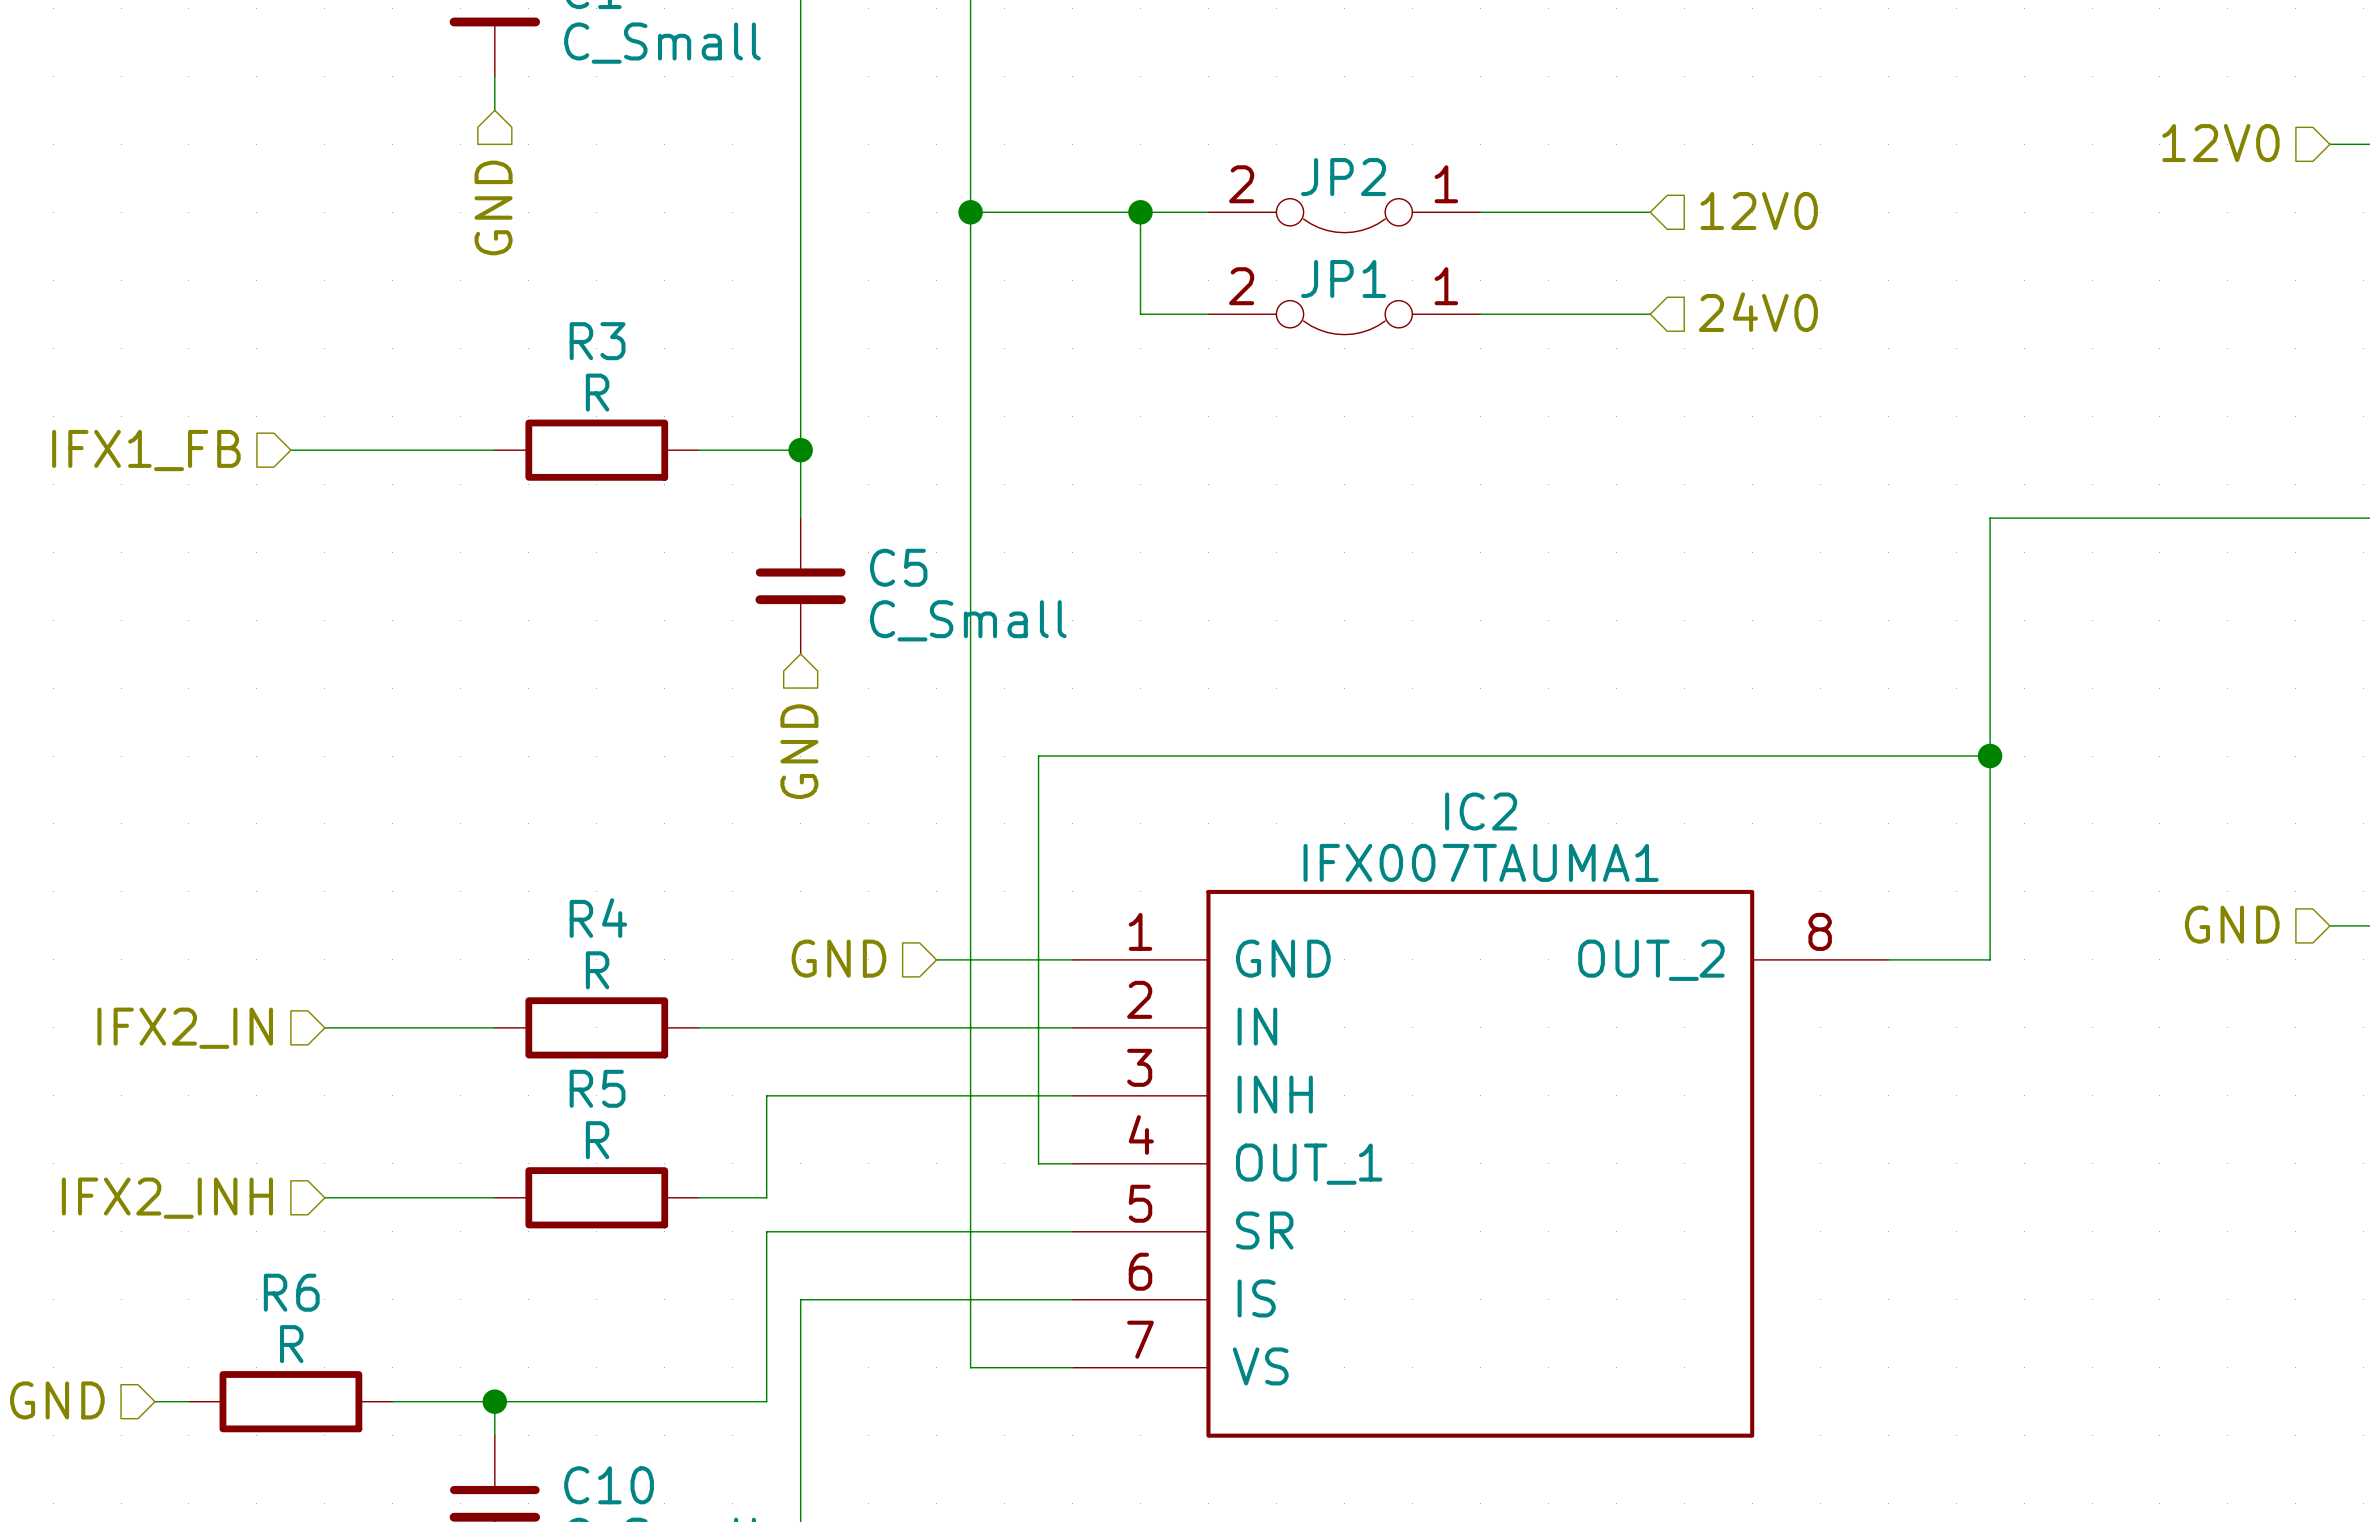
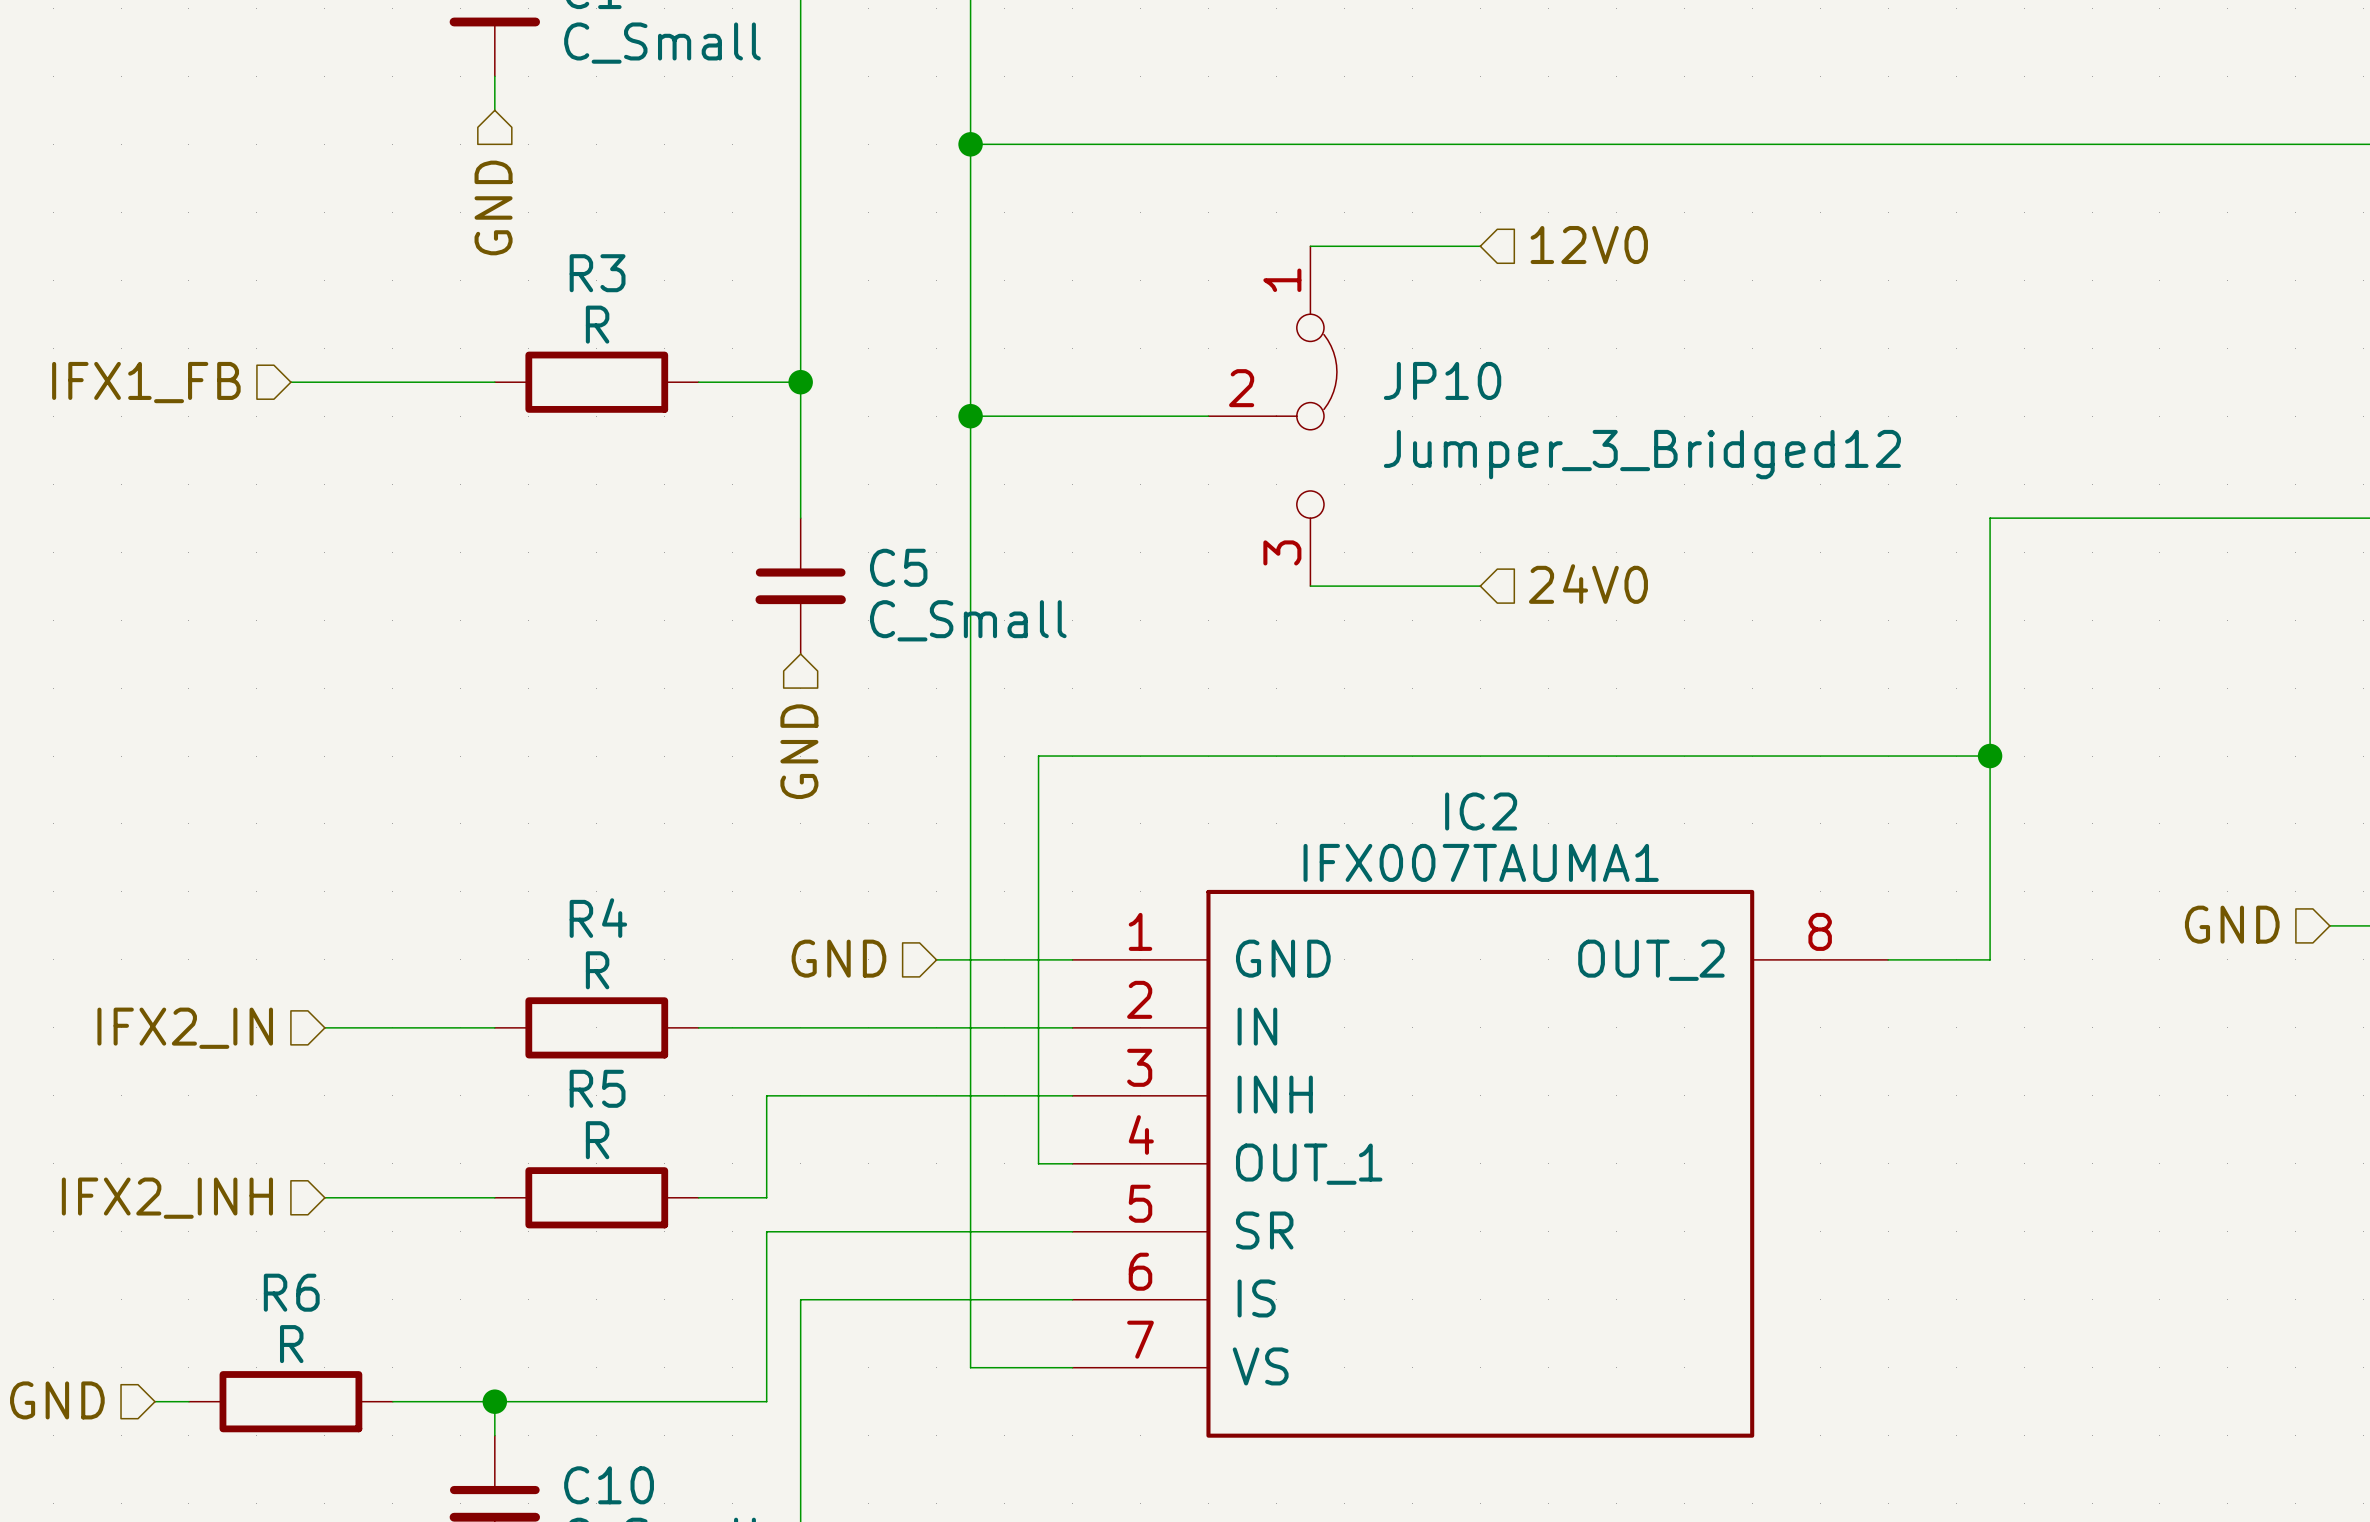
hierarchical label: 12V0 (2220, 143) -> none
wire: none -> (970, 144) (2329, 144)
hierarchical label position: 12V0 (1759, 211) -> 12V0 (1589, 245)
wire: (970, 212) (1208, 212) -> (970, 416) (1208, 416)
junction position: (970, 212) -> (970, 144)
wire: (1140, 212) (1140, 314) (1208, 314) -> none
junction: (1140, 212) -> none
wire: (1480, 212) (1650, 212) -> (1310, 246) (1480, 246)
JP2: (1344, 215) -> none
hierarchical label position: 24V0 (1758, 312) -> 24V0 (1588, 584)
wire: (1480, 314) (1650, 314) -> (1310, 586) (1480, 586)
JP1: (1344, 317) -> none
junction: none -> (970, 416)
JP10: none -> Jumper_3_Bridged12 (1272, 416)
hierarchical label position: IFX1_FB (146, 450) -> IFX1_FB (146, 382)
wire: (290, 450) (494, 450) -> (290, 382) (494, 382)
R3 position: (596, 450) -> (596, 382)
wire: (698, 450) (800, 450) -> (698, 382) (800, 382)
junction position: (800, 450) -> (800, 382)

